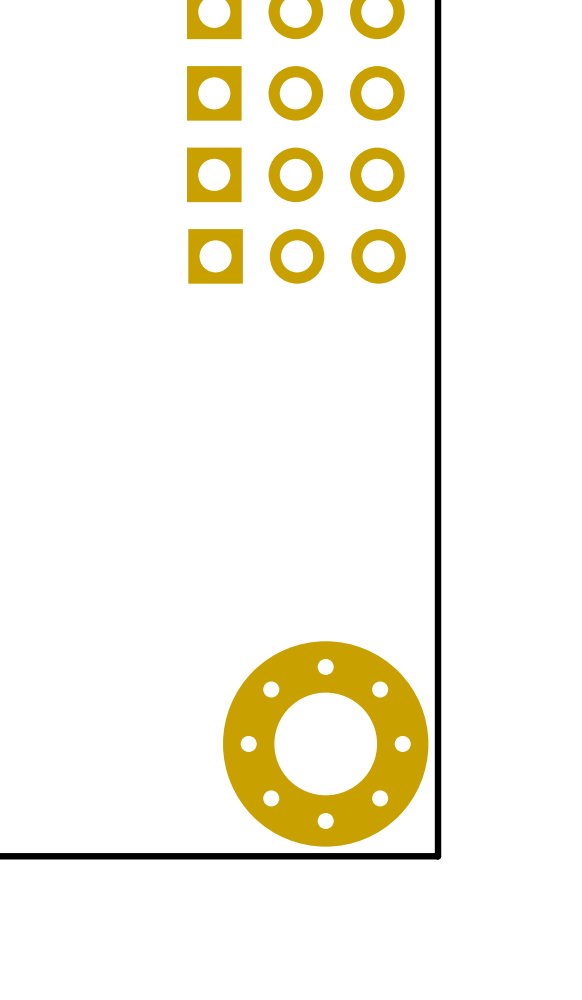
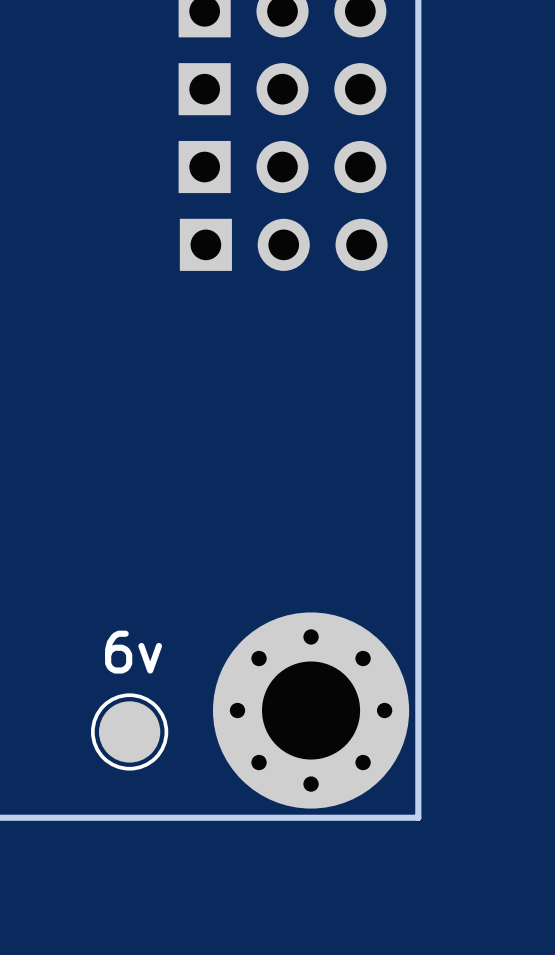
text: none -> 6v (133, 652)
part: none -> (129, 731)

